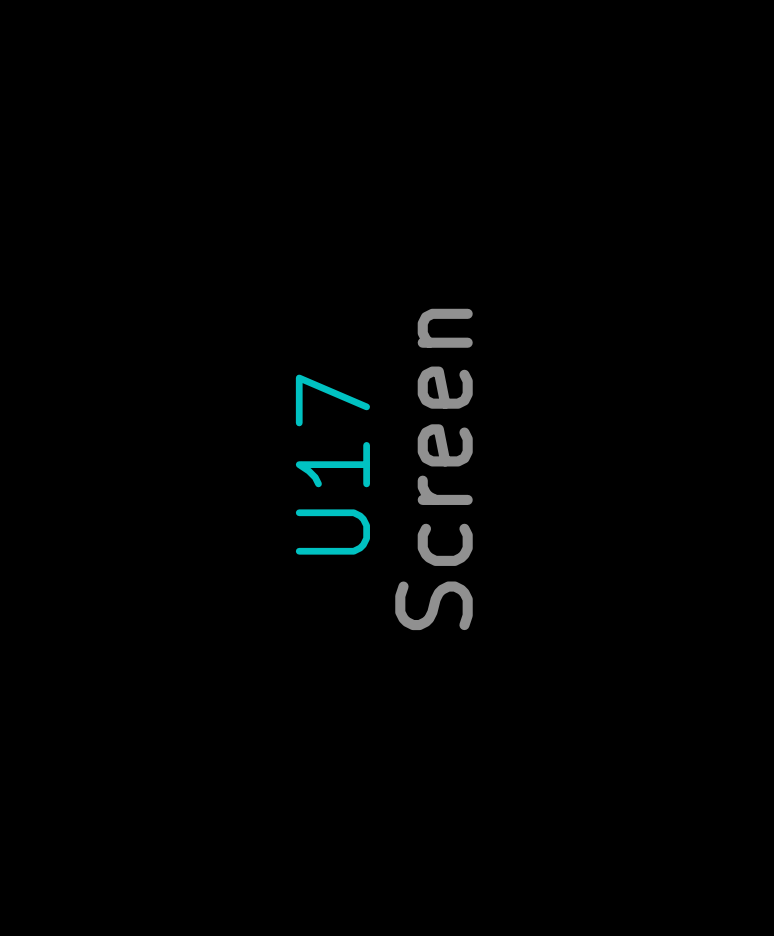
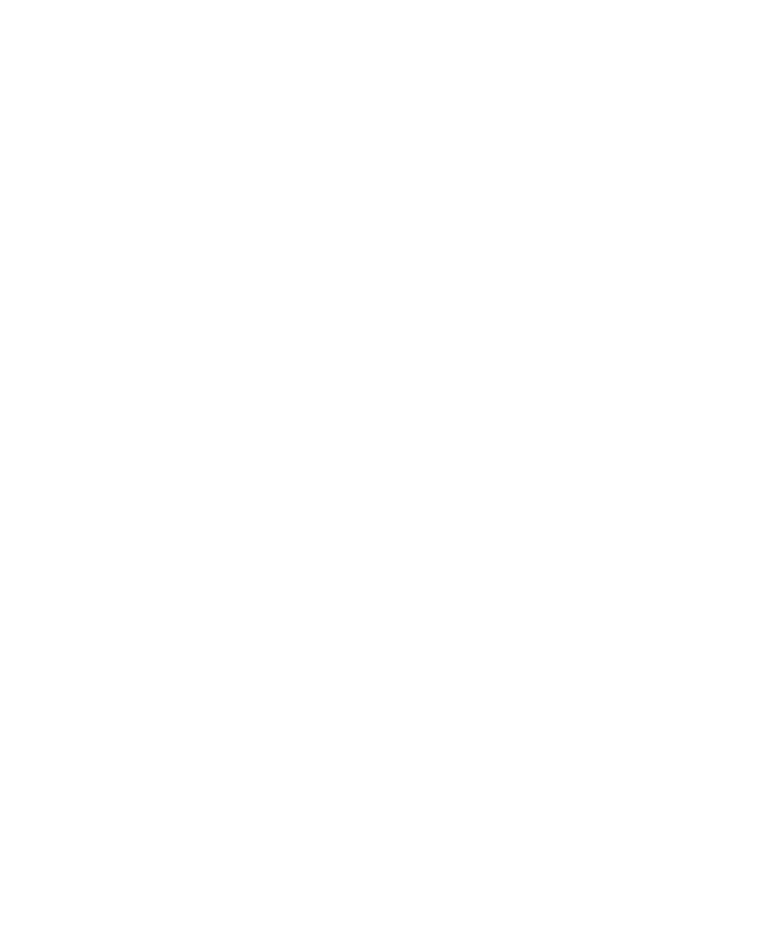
U17: Screen (384, 469) -> none

